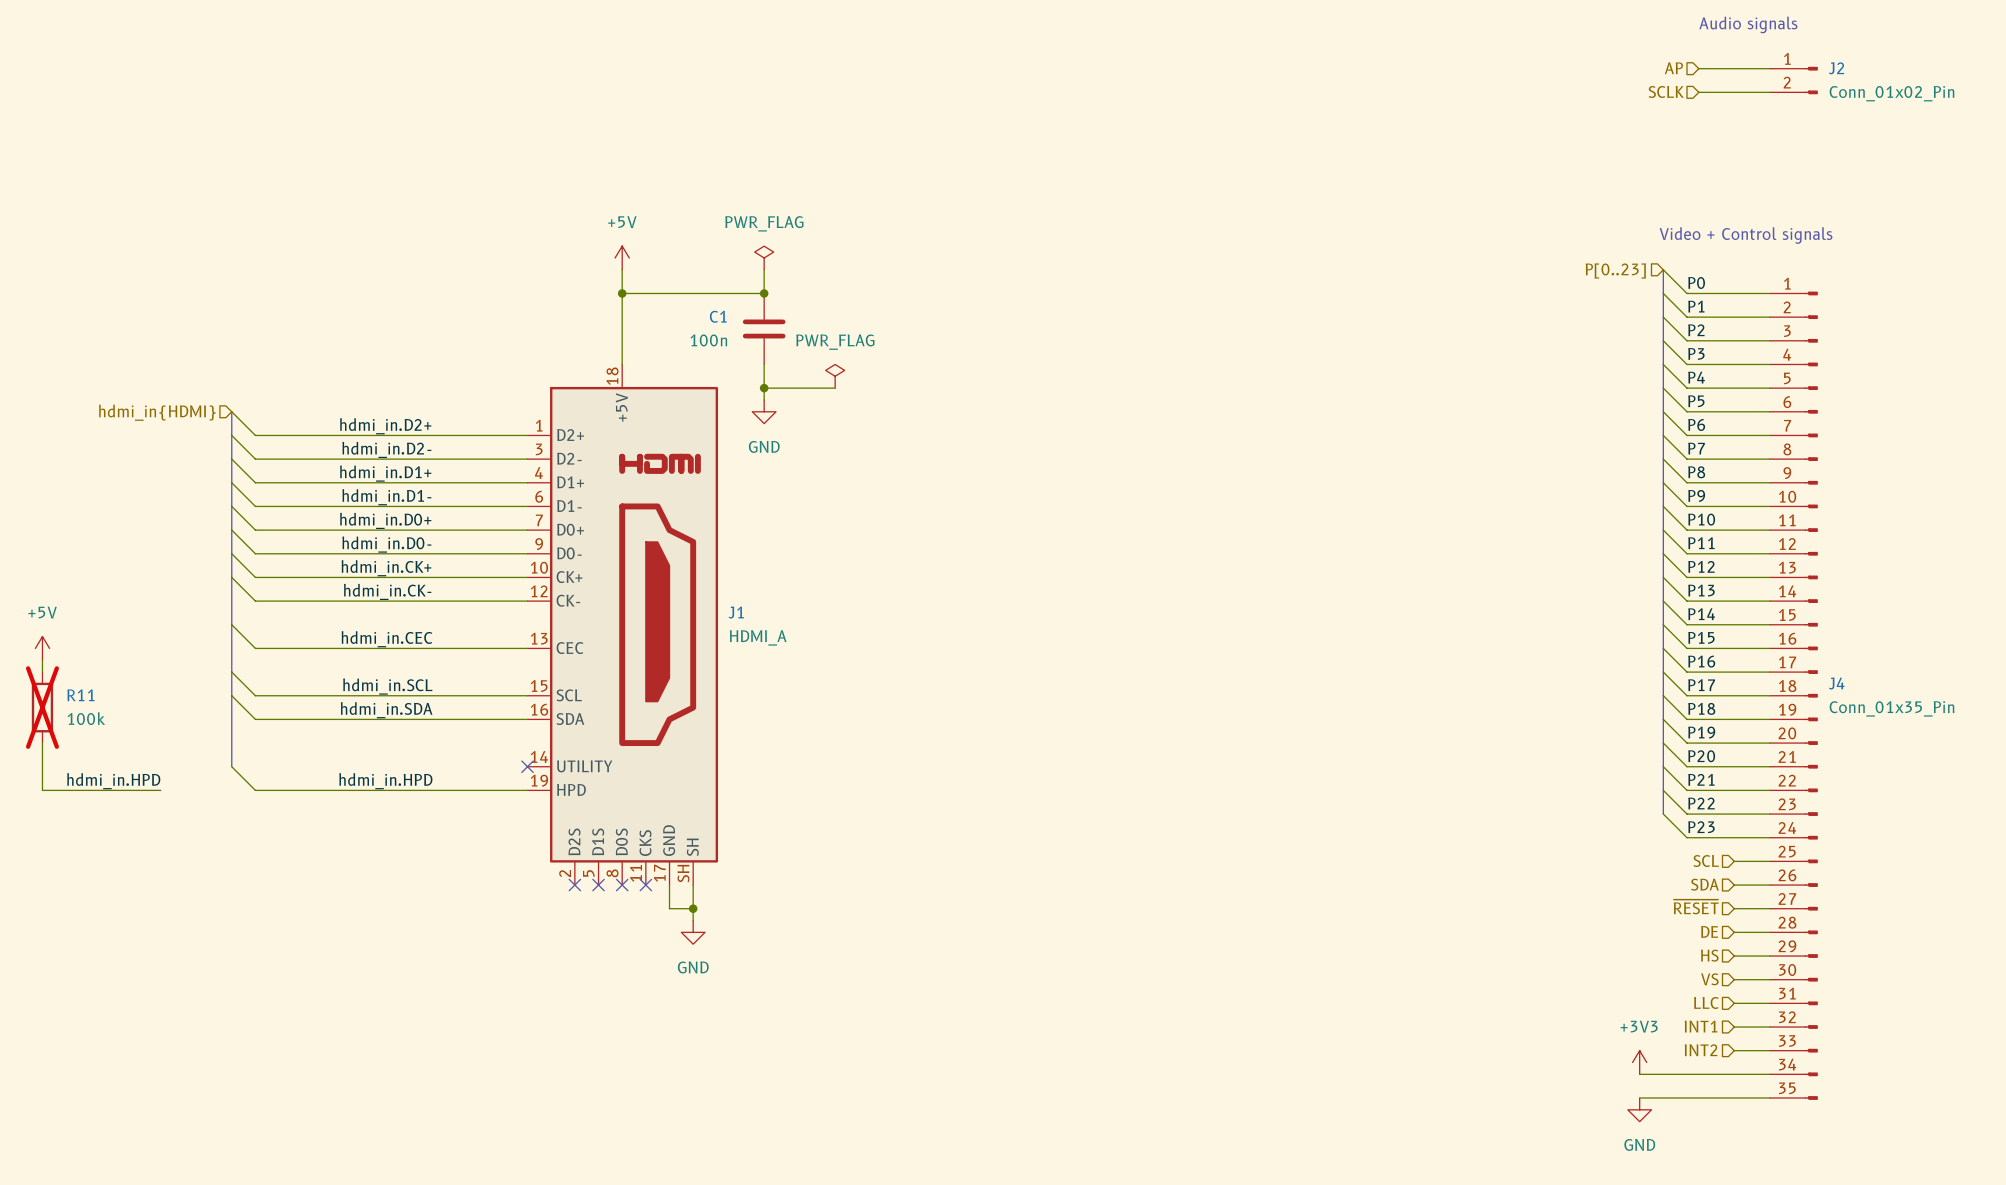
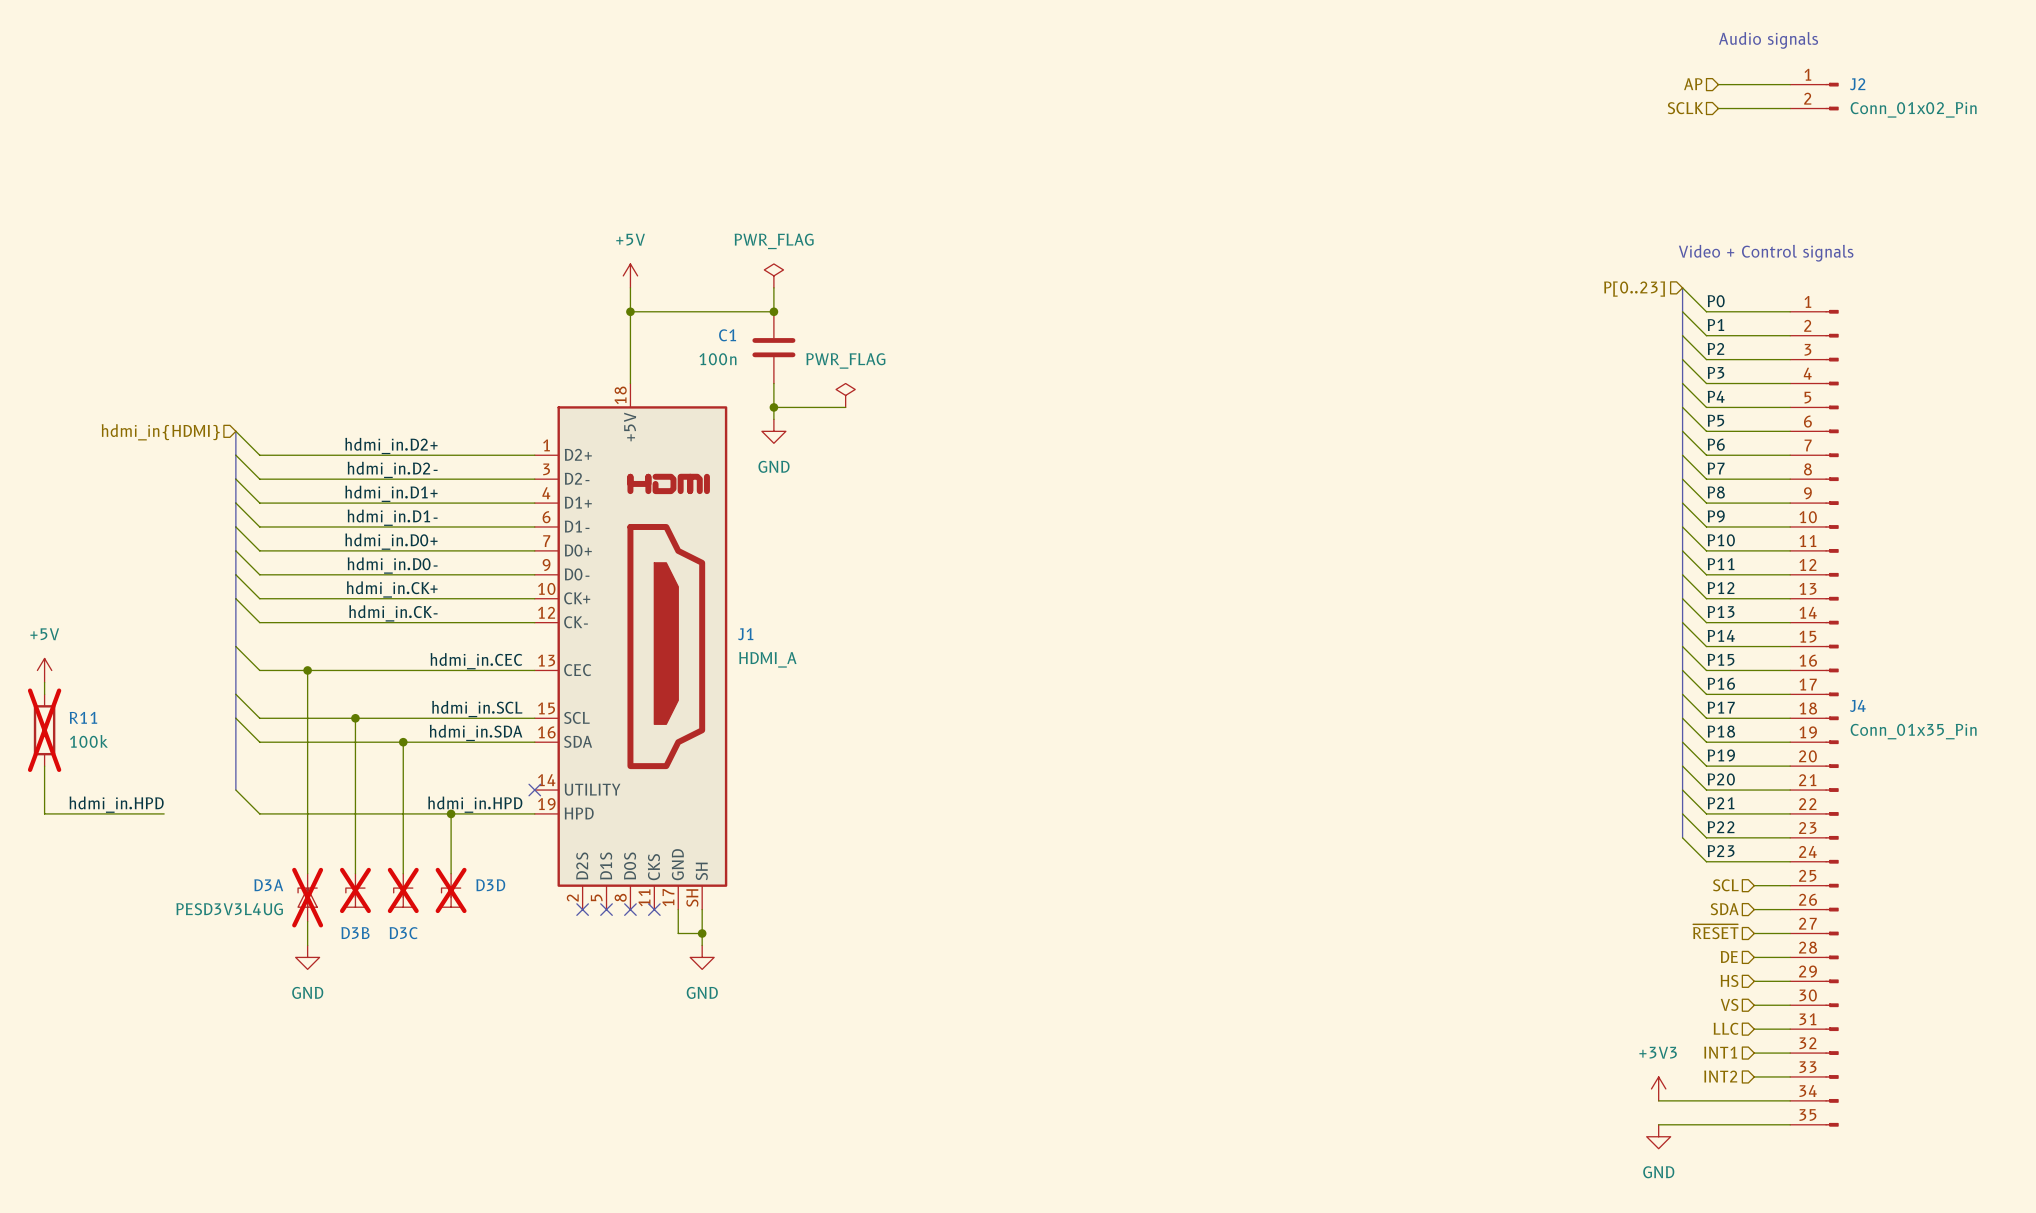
label position: hdmi_in.CEC (386, 639) -> hdmi_in.CEC (476, 661)
wire: none -> (307, 670) (307, 873)
junction: none -> (307, 670)
label position: hdmi_in.SCL (387, 686) -> hdmi_in.SCL (477, 709)
wire: none -> (355, 718) (355, 873)
junction: none -> (355, 718)
label position: hdmi_in.SDA (386, 710) -> hdmi_in.SDA (476, 732)
wire: none -> (403, 742) (403, 873)
junction: none -> (403, 742)
label position: hdmi_in.HPD (385, 781) -> hdmi_in.HPD (475, 804)
wire: none -> (451, 813) (451, 873)
junction: none -> (451, 813)
D3B: none -> (355, 890)
D3C: none -> (403, 890)
D3D: none -> (451, 890)
D3A: none -> PESD3V3L4UG (307, 897)
wire: none -> (307, 921) (307, 945)
power symbol: none -> GND (307, 957)

